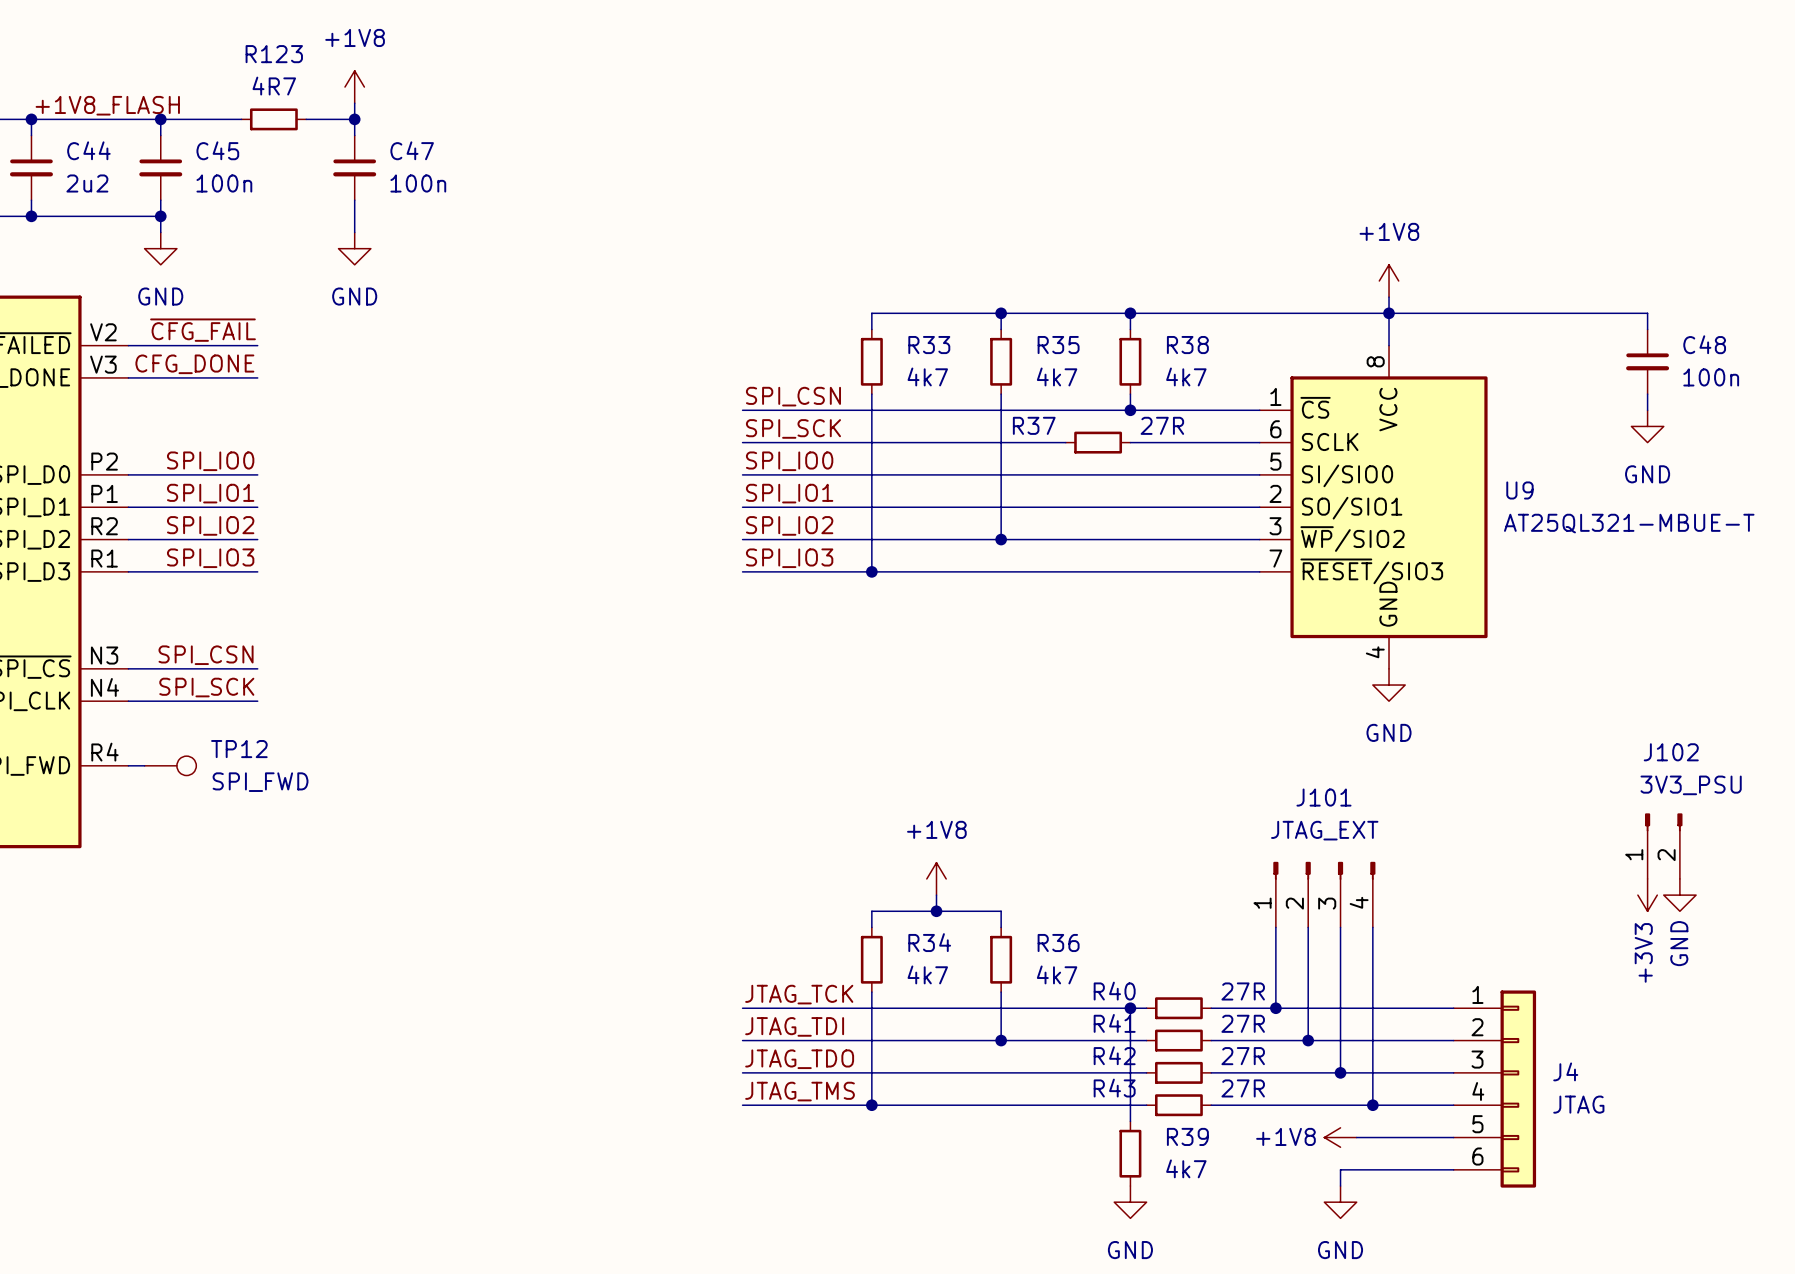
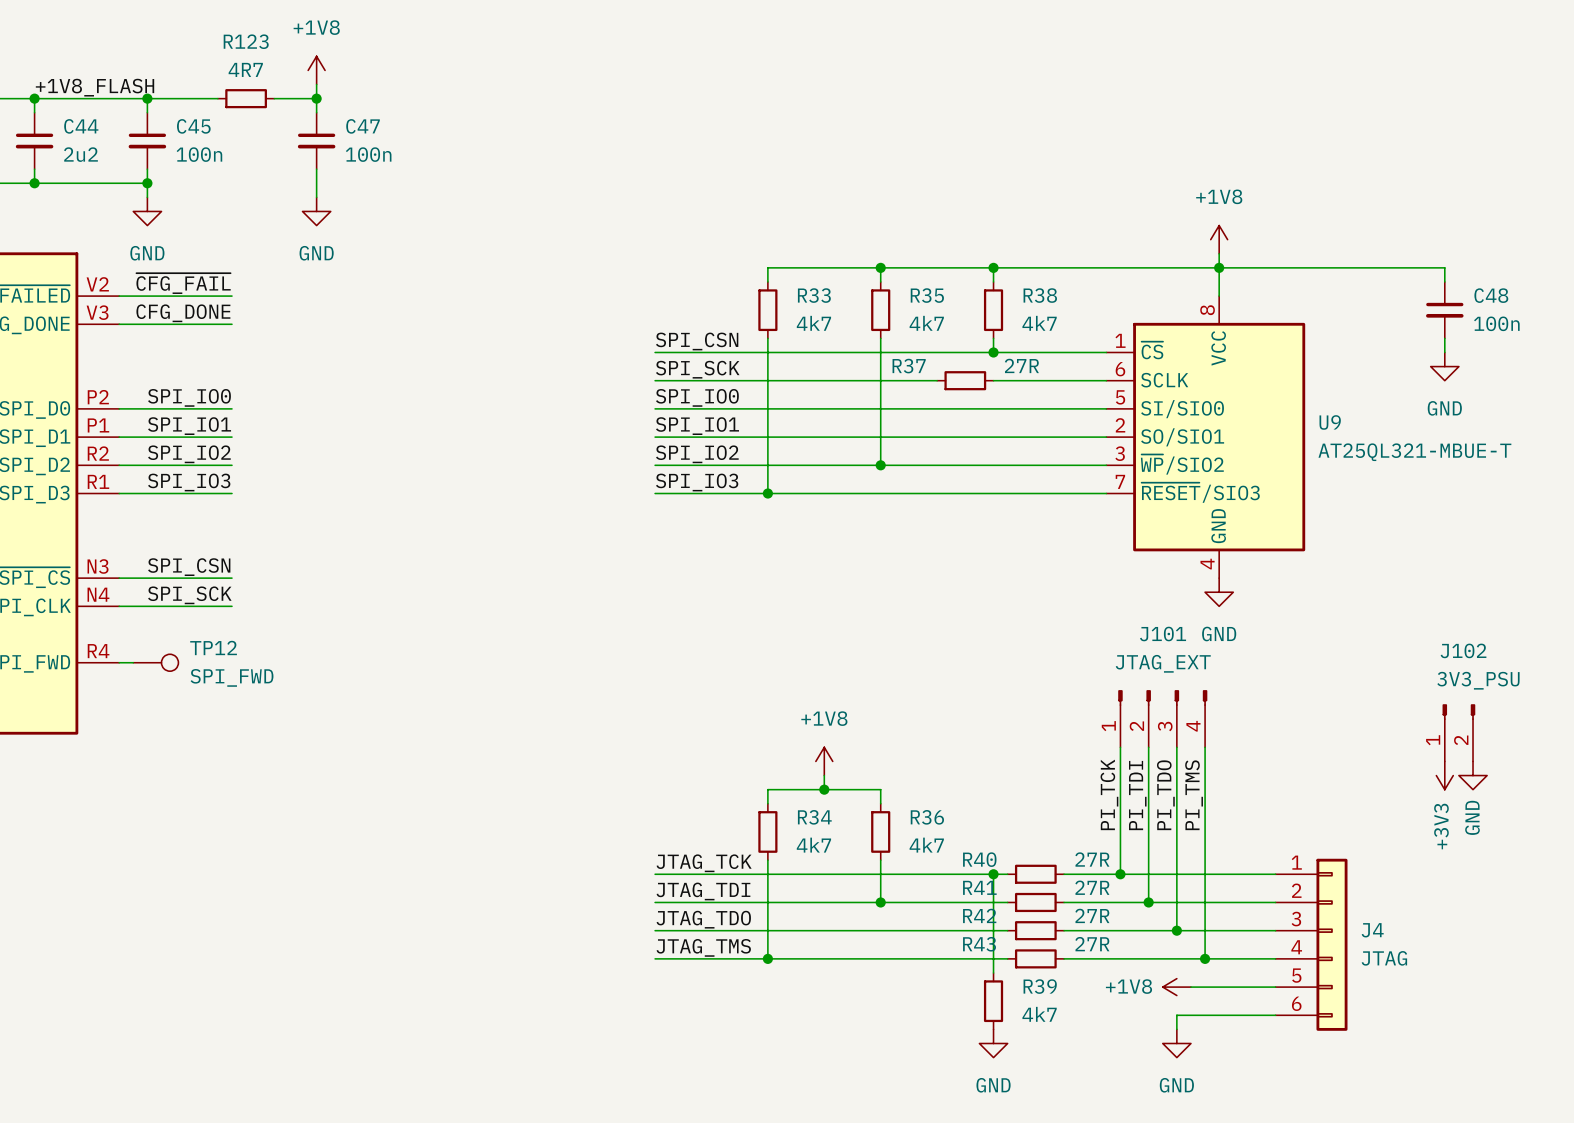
J101 position: (1324, 894) -> (1162, 718)
label: none -> PI_TMS (1194, 795)
label: none -> PI_TCK (1109, 794)
label: none -> PI_TDO (1165, 795)
label: none -> PI_TDI (1137, 795)

